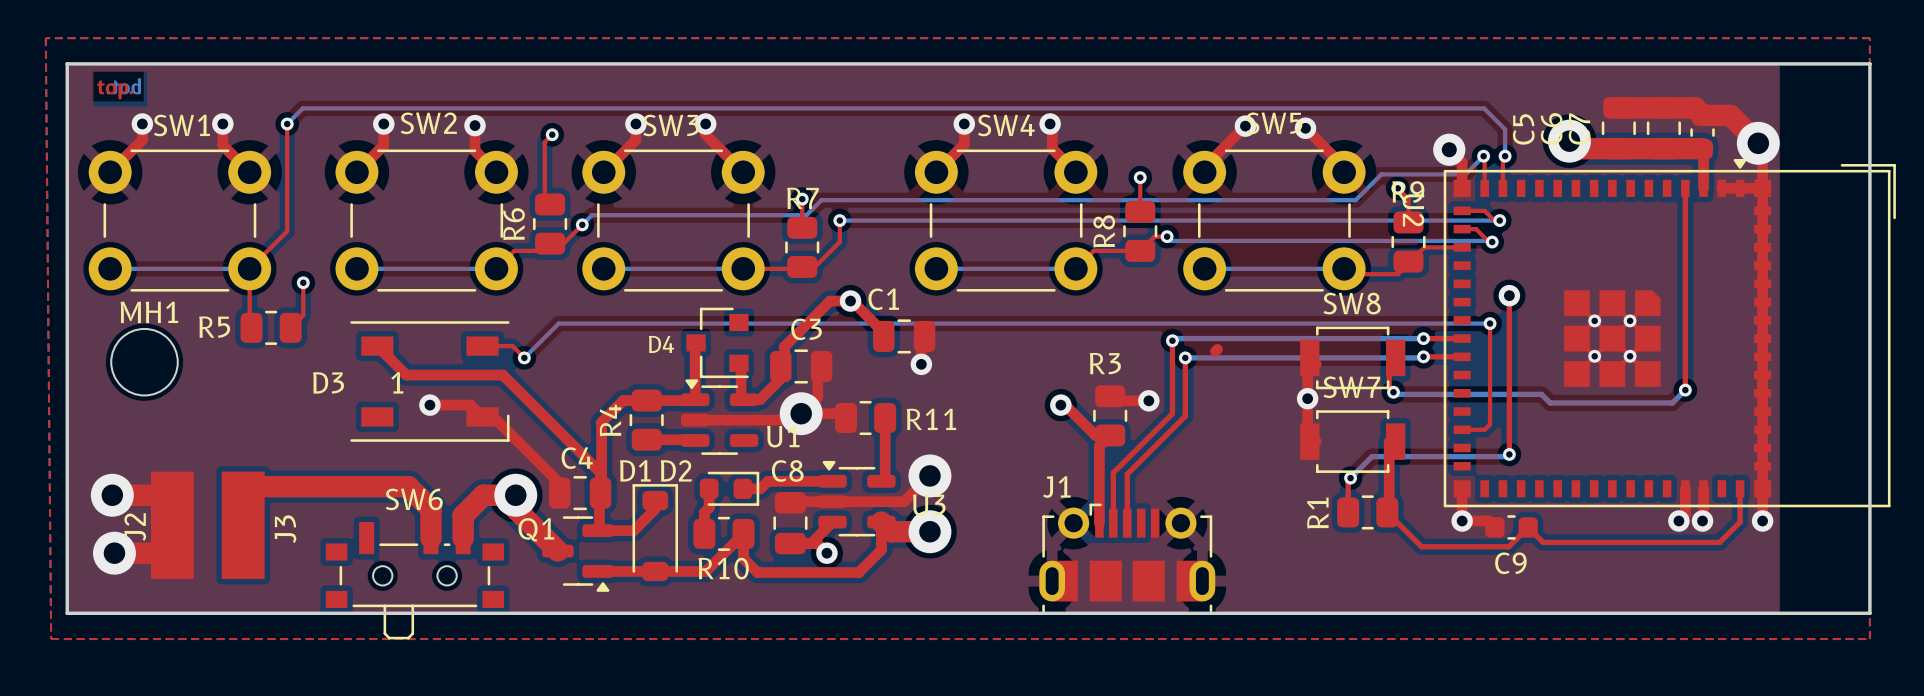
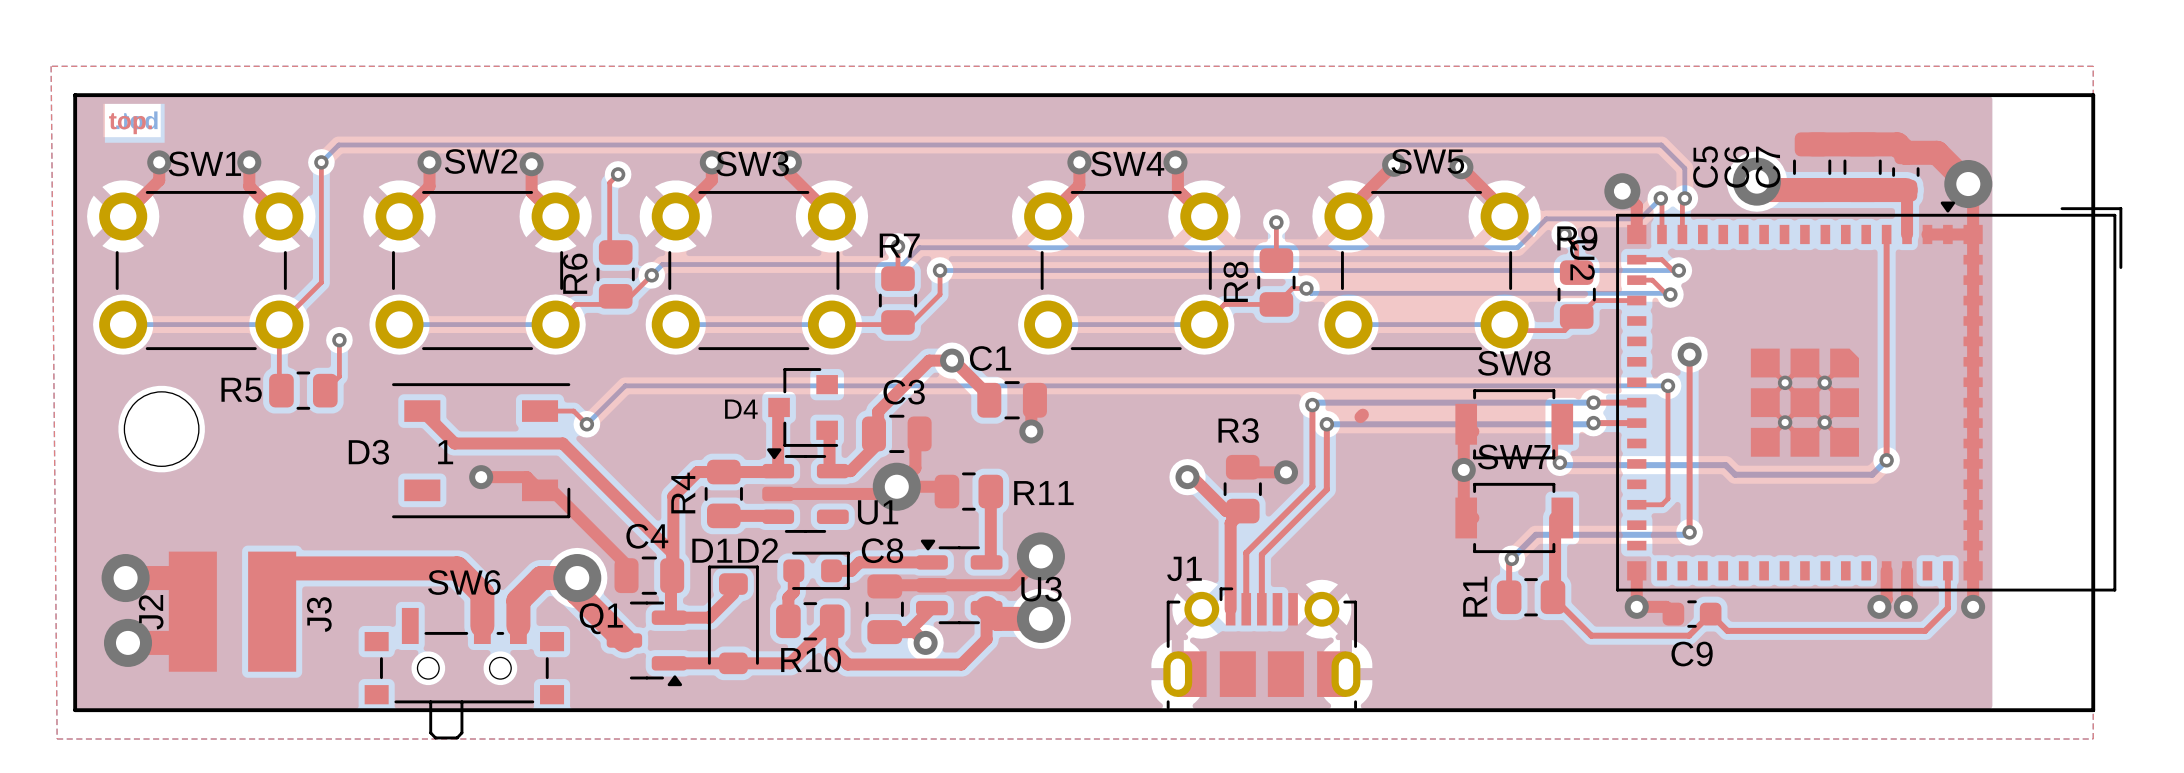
MH1 name: MH1 (149, 312) -> none

